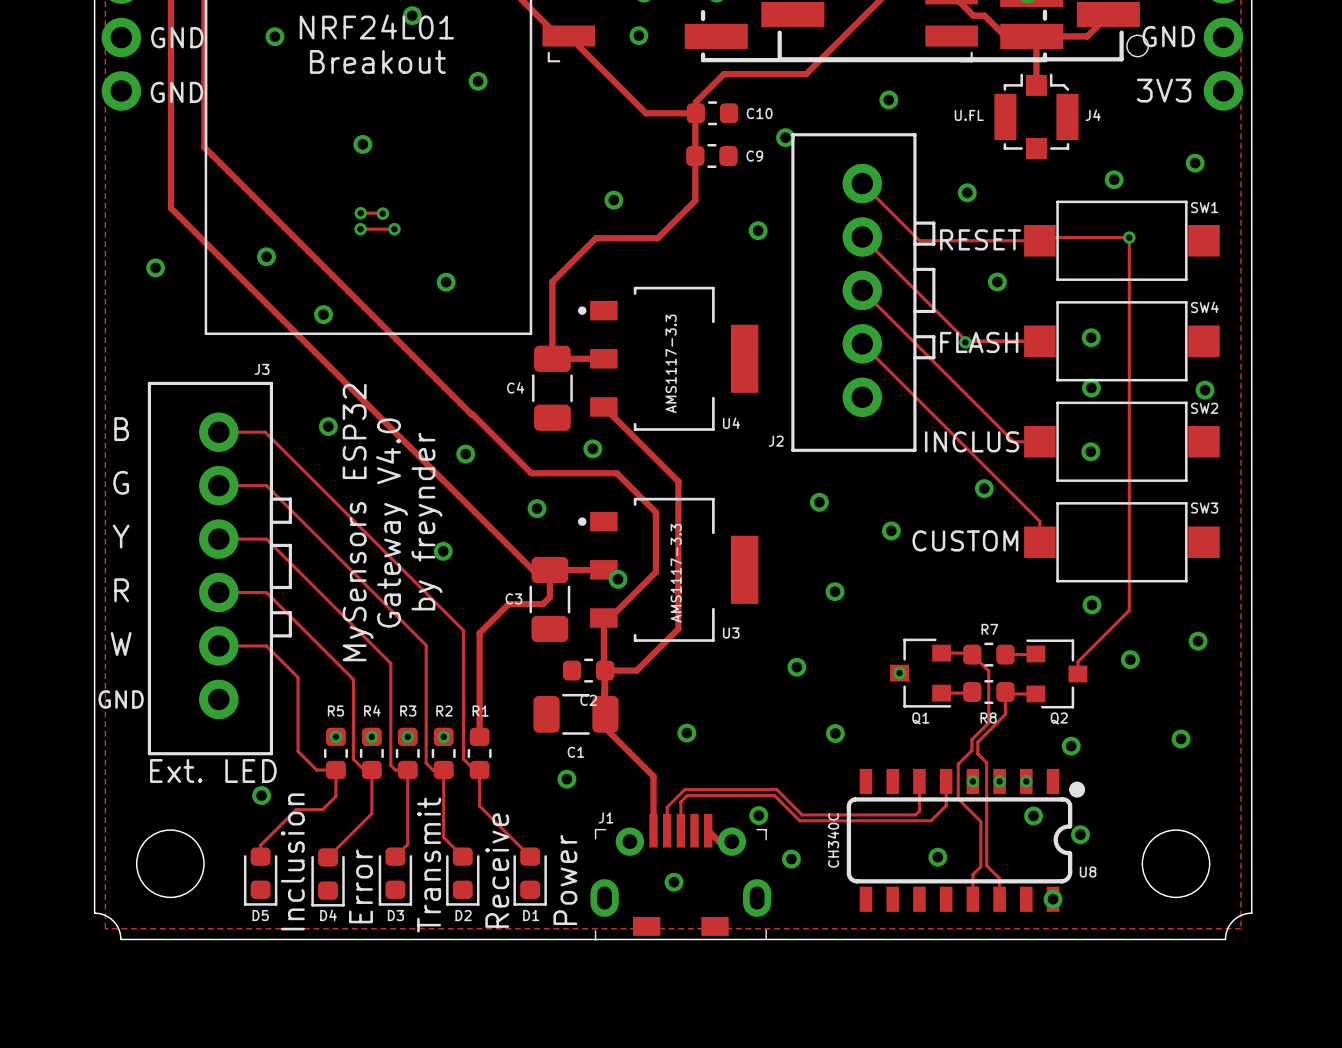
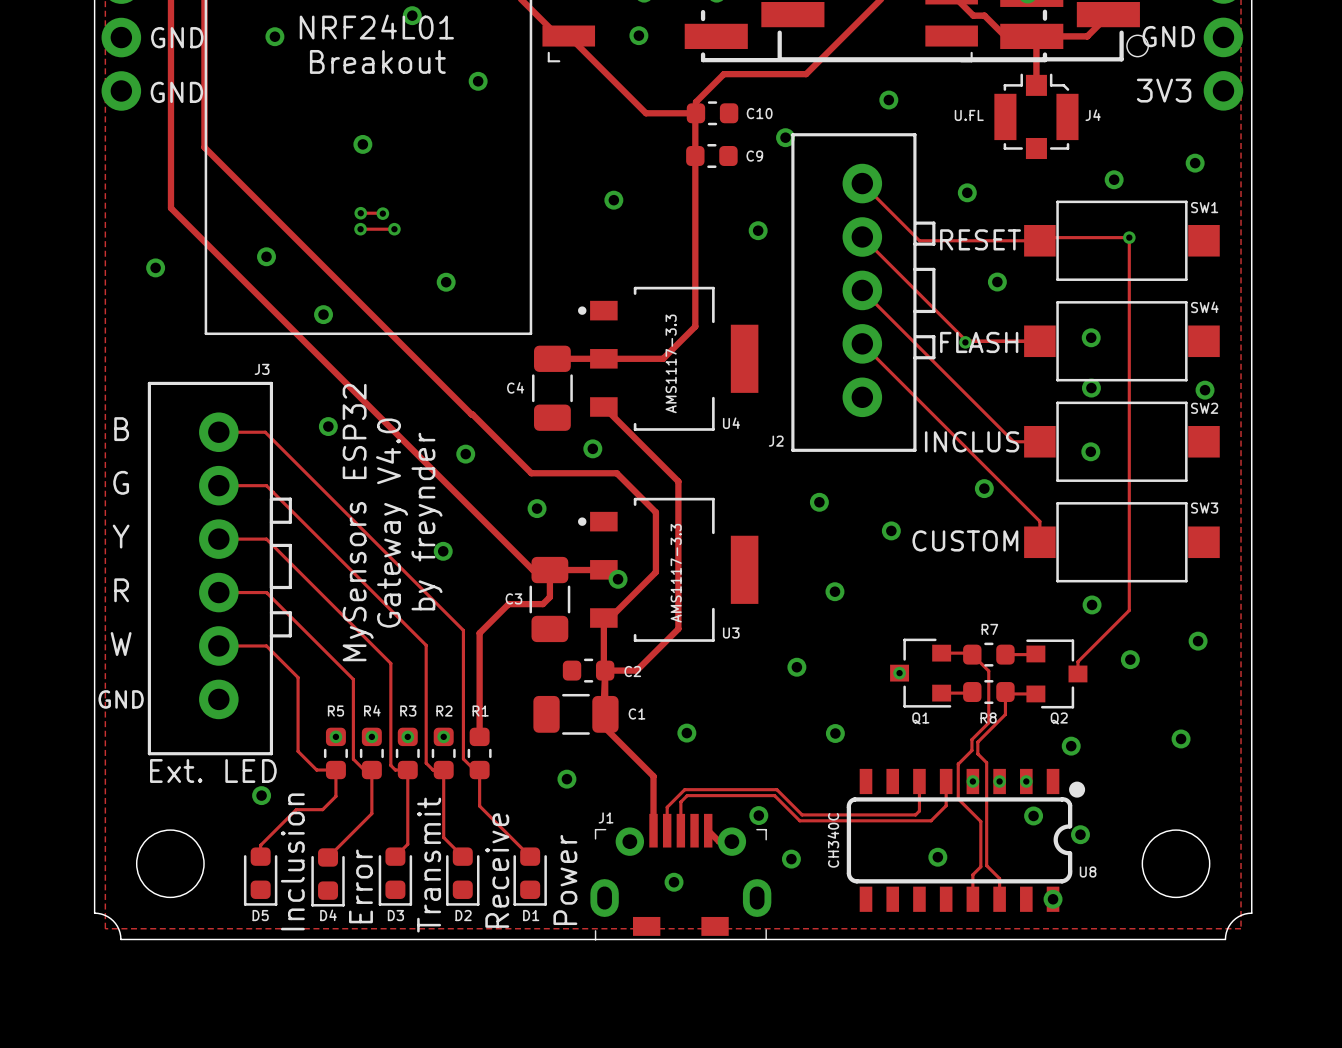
track: (695, 200) (657, 238) (595, 238) (552, 281) (552, 358) -> (695, 200) (695, 326) (663, 358) (603, 358)
C2 name position: C2 (588, 700) -> C2 (632, 671)
C1 name position: C1 (575, 752) -> C1 (637, 714)

